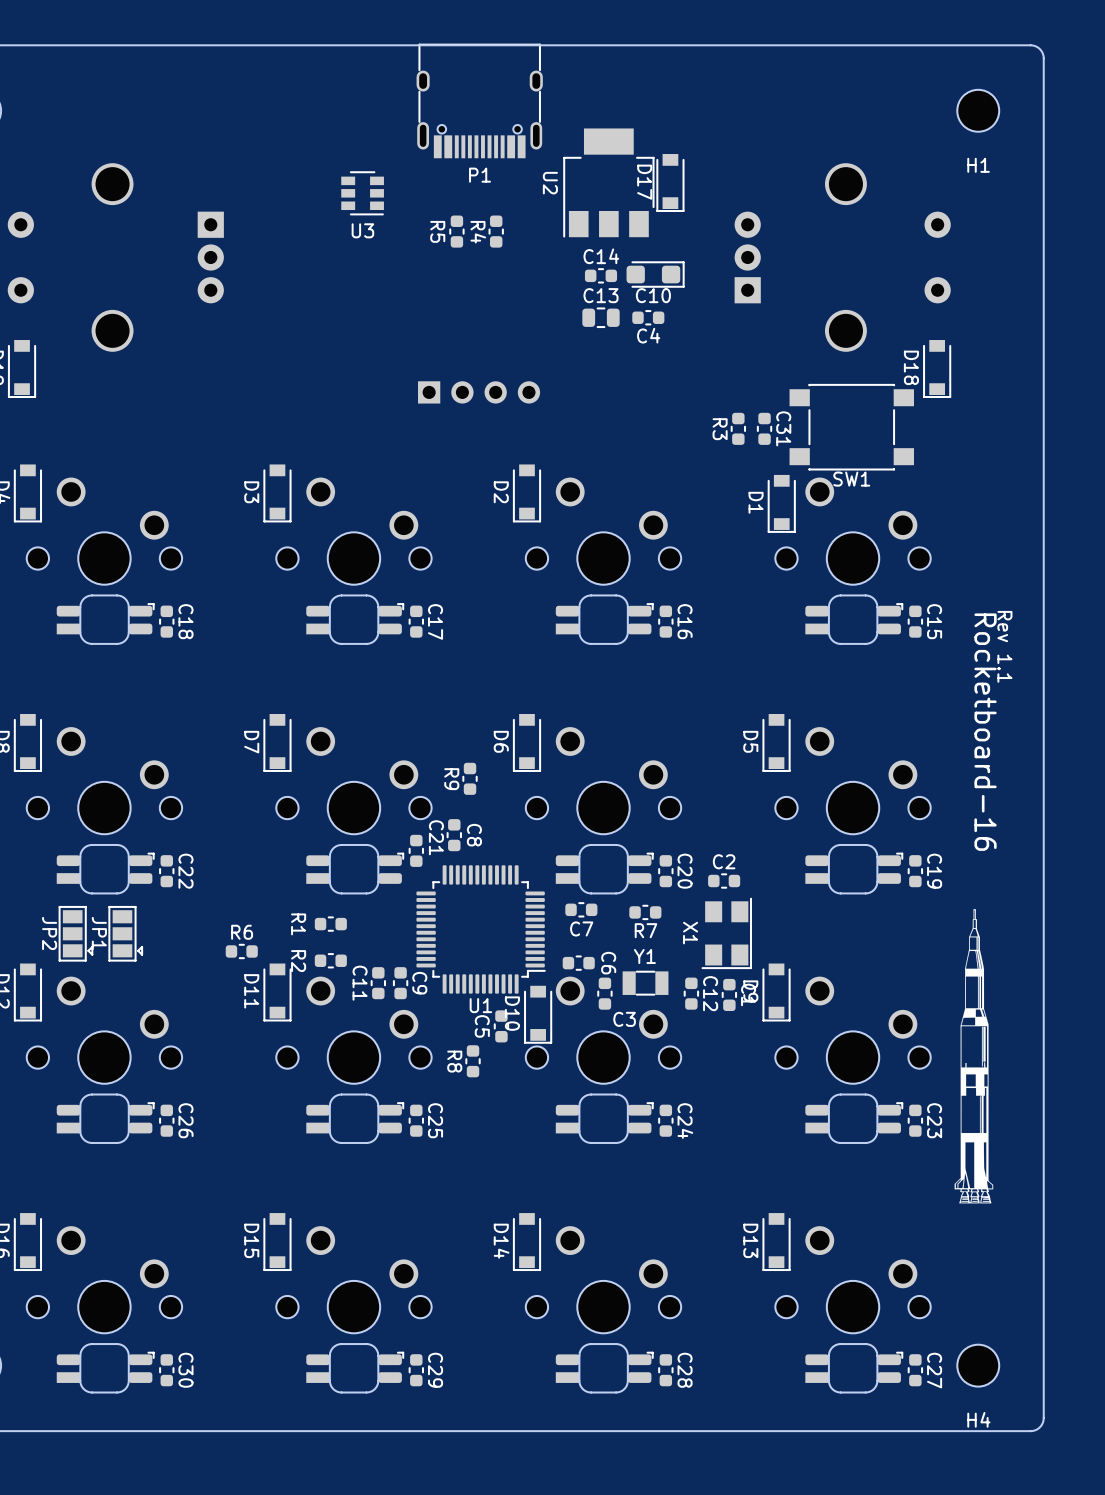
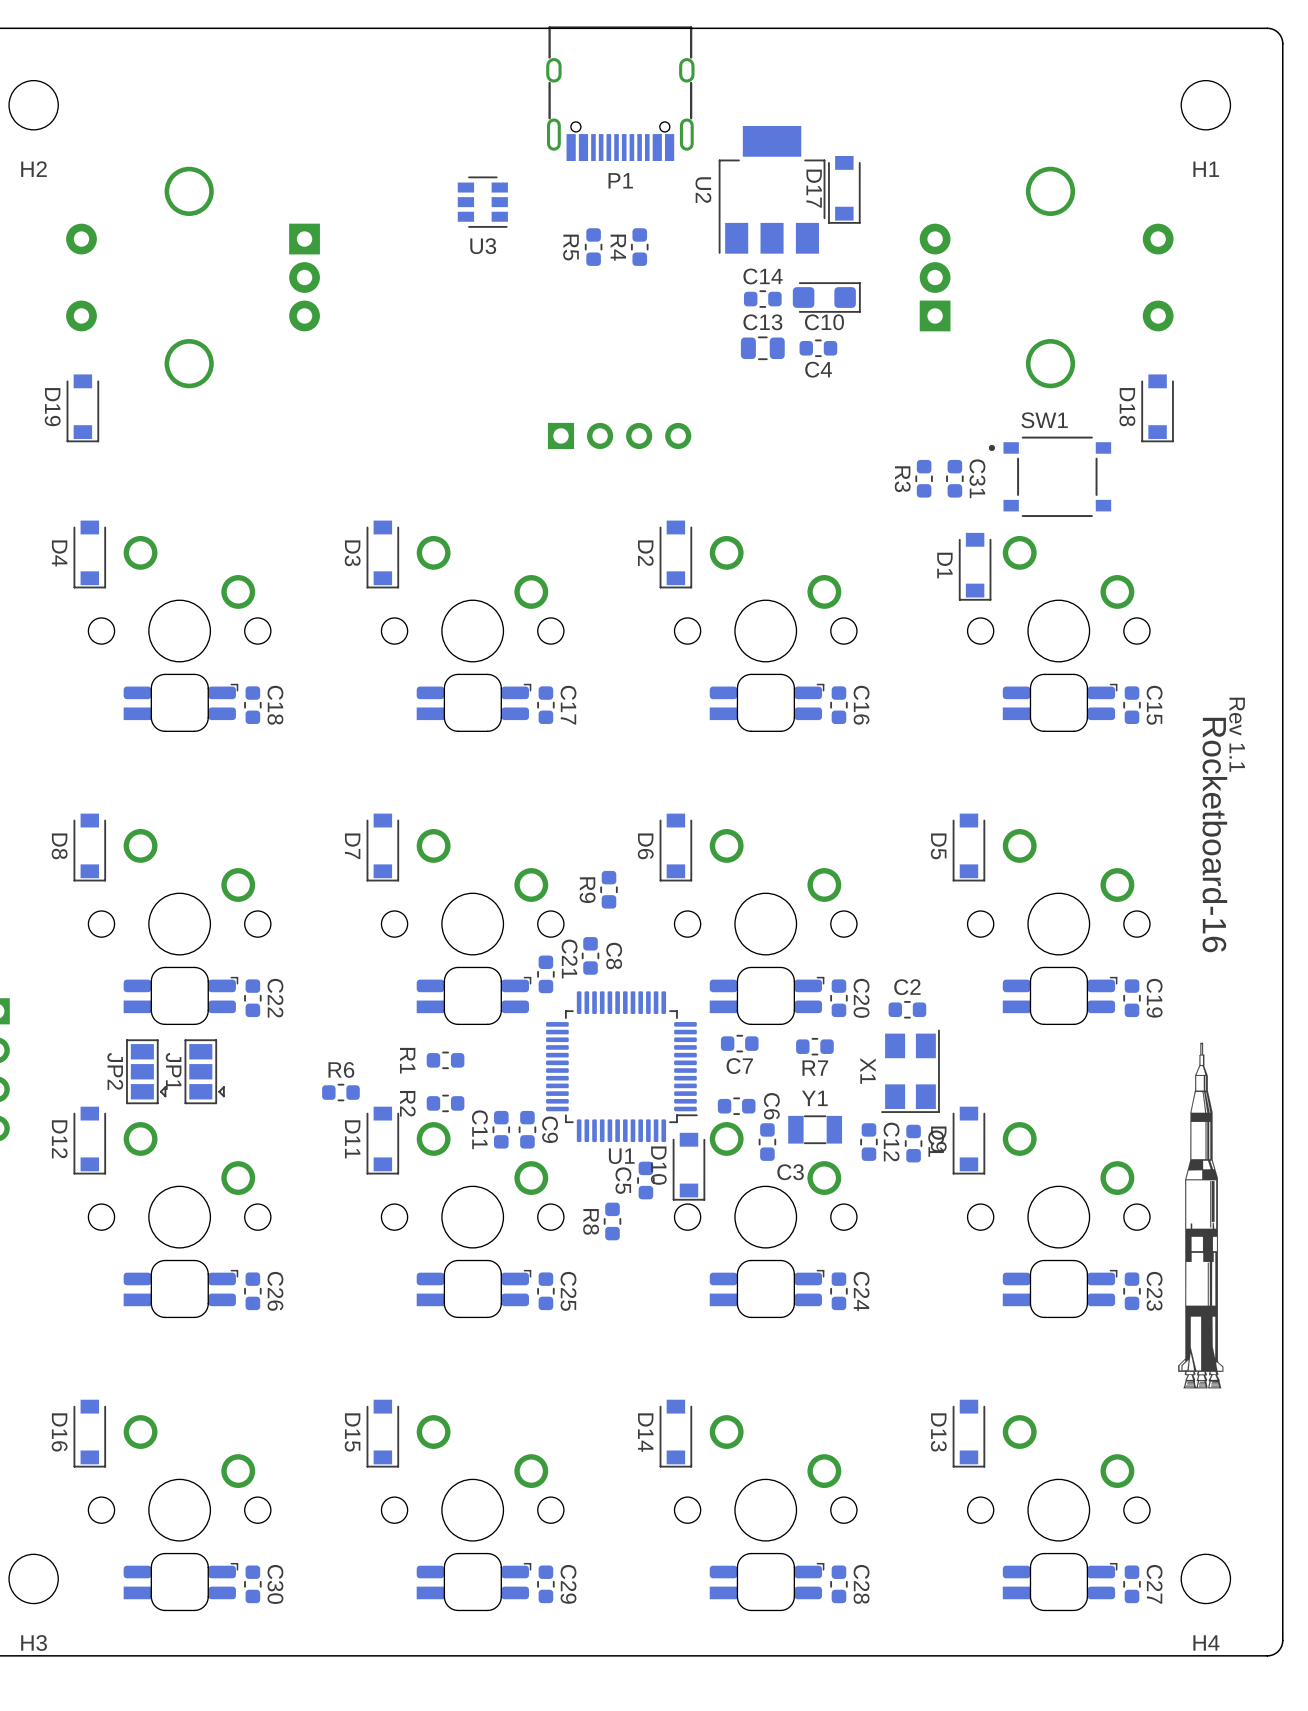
SW1 footprint: [789, 384, 914, 471] -> [988, 436, 1112, 518]
SW1 name position: SW1 (851, 479) -> SW1 (1044, 420)

